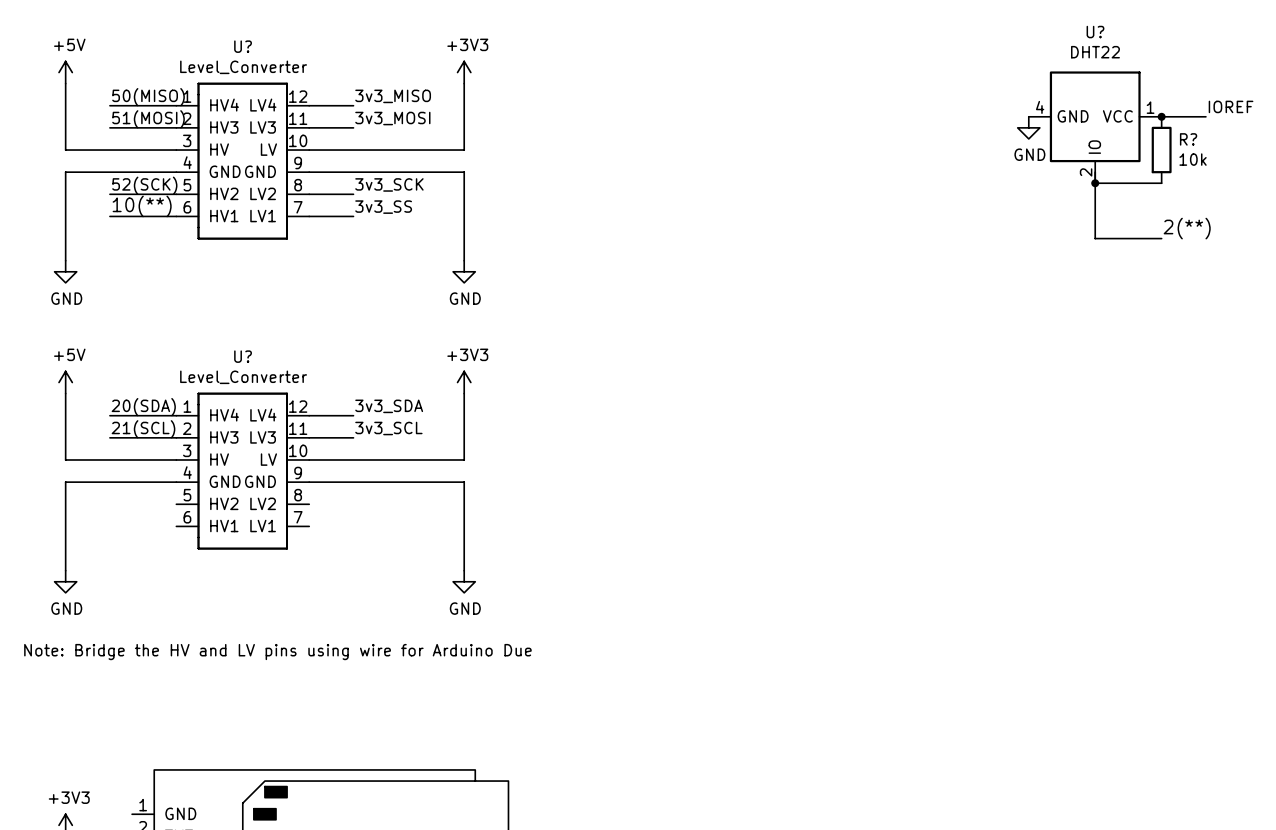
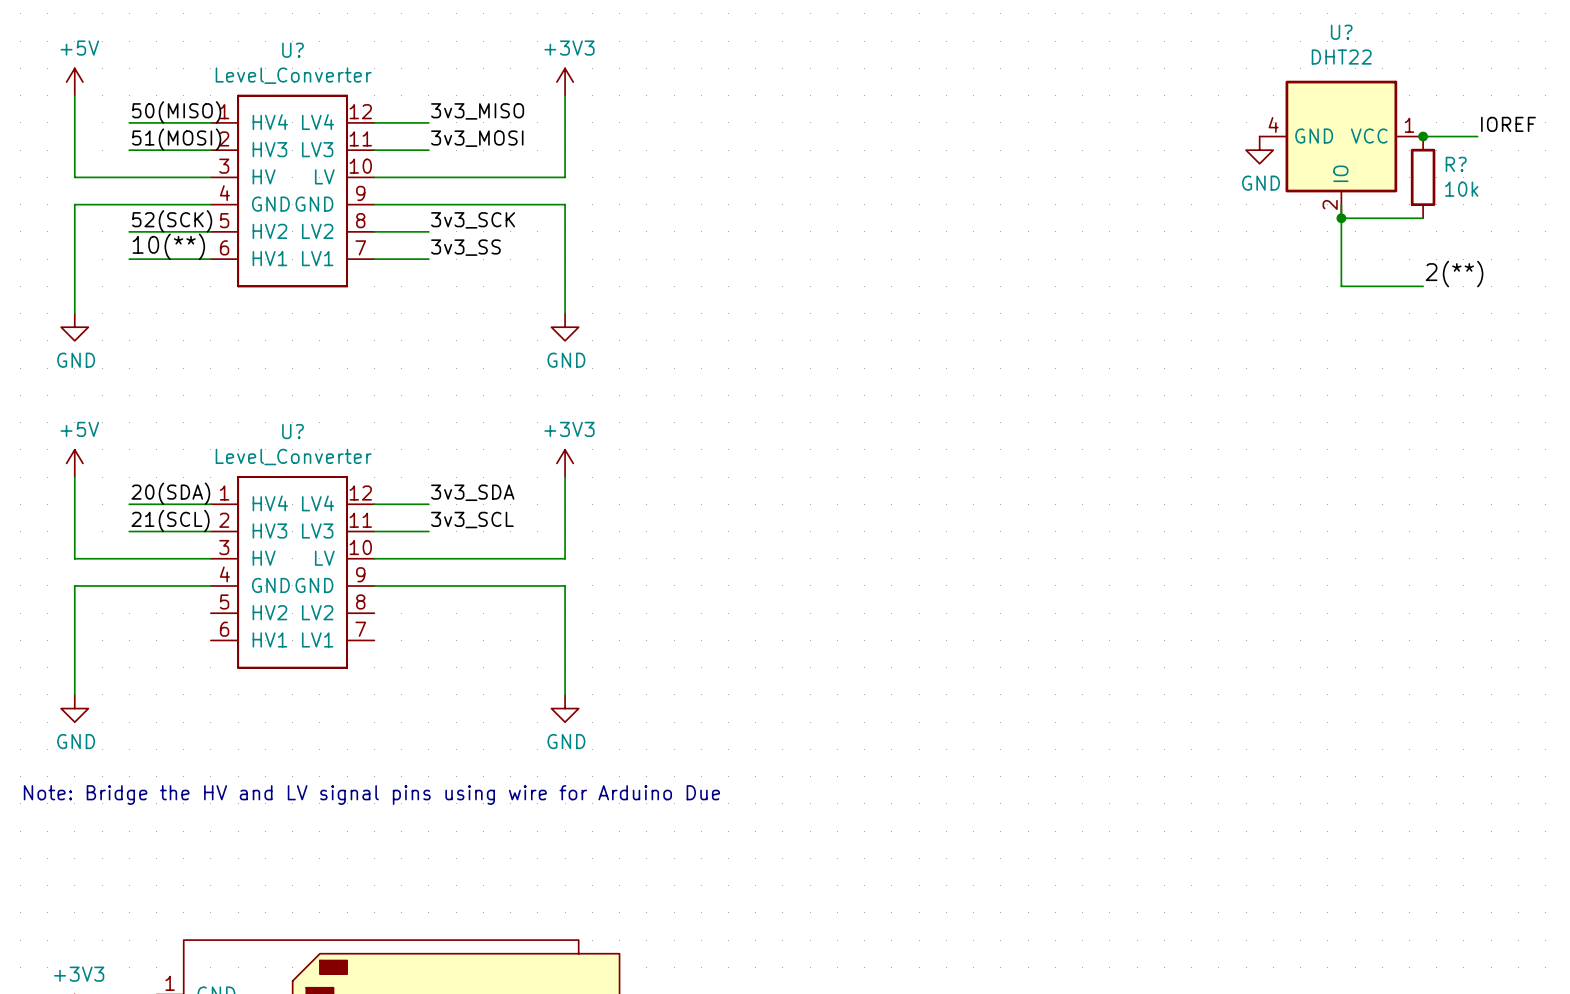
text: Note: Bridge the HV and LV pins using wire for Arduino Due (277, 652) -> Note: Bridge the HV and LV signal pins using wire for Arduino Due (371, 795)

